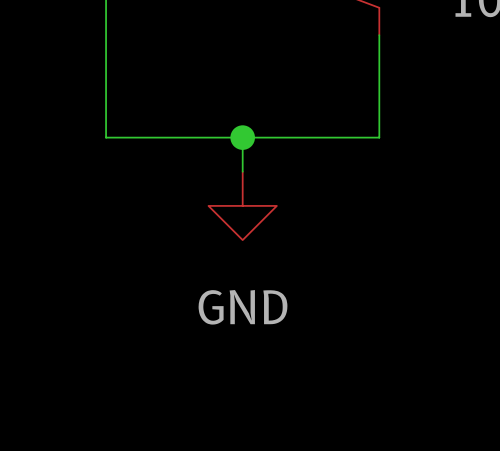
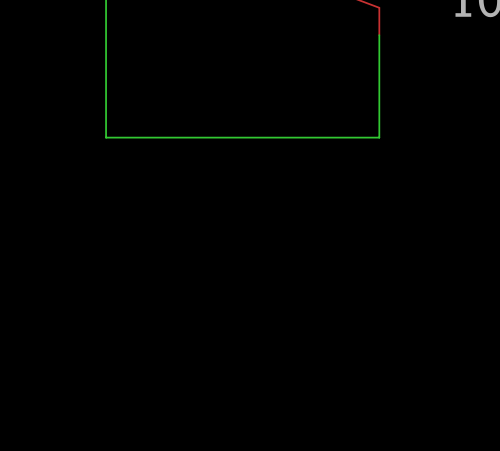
wire: (242, 137) (242, 171) -> none
junction: (242, 137) -> none
power symbol: GND (242, 205) -> none

